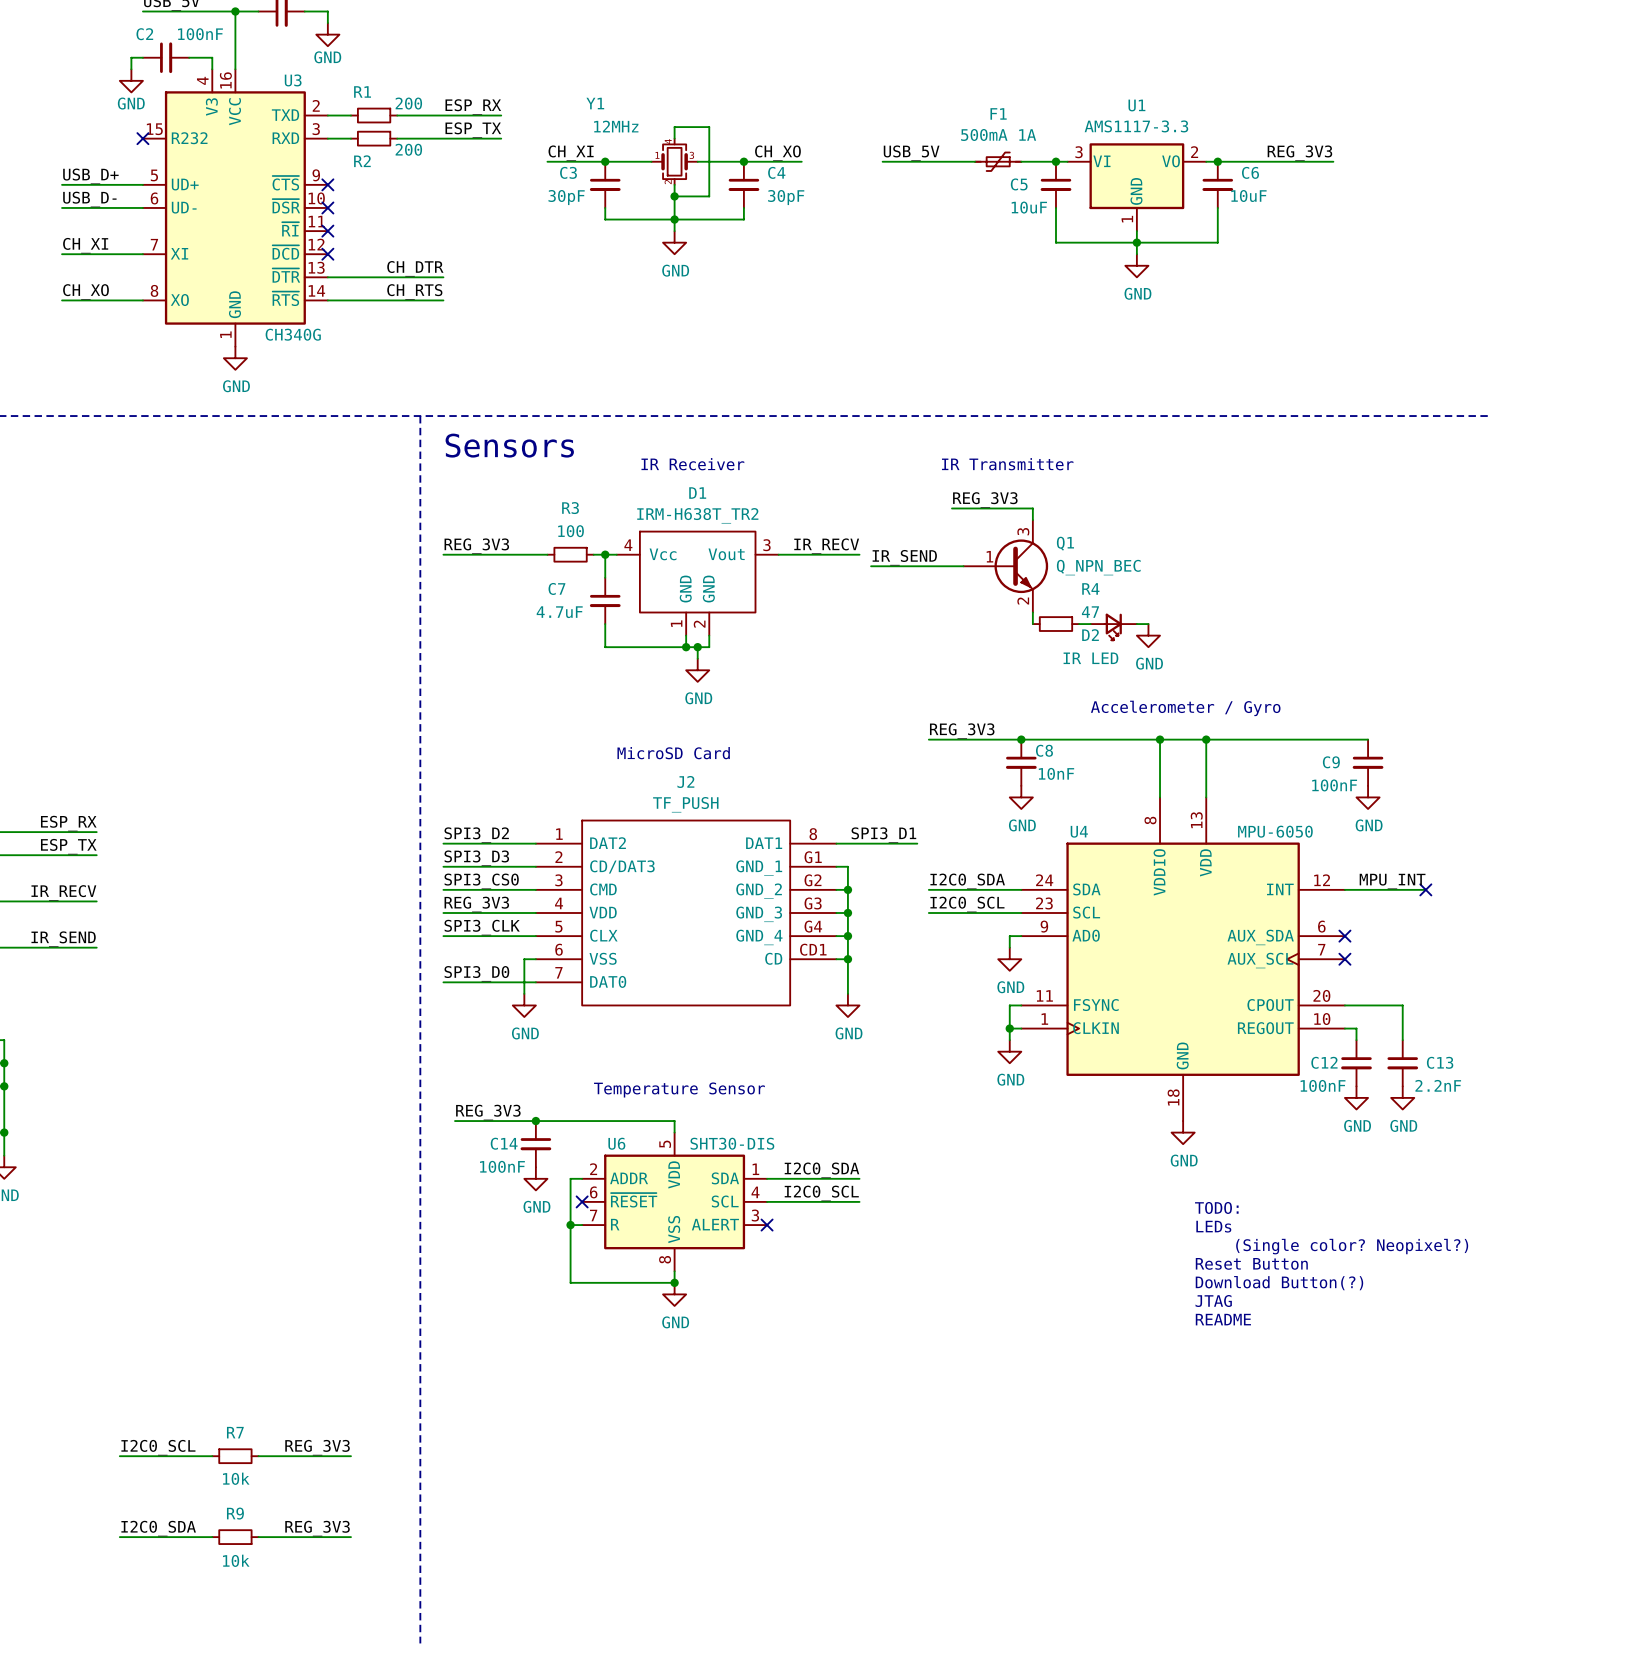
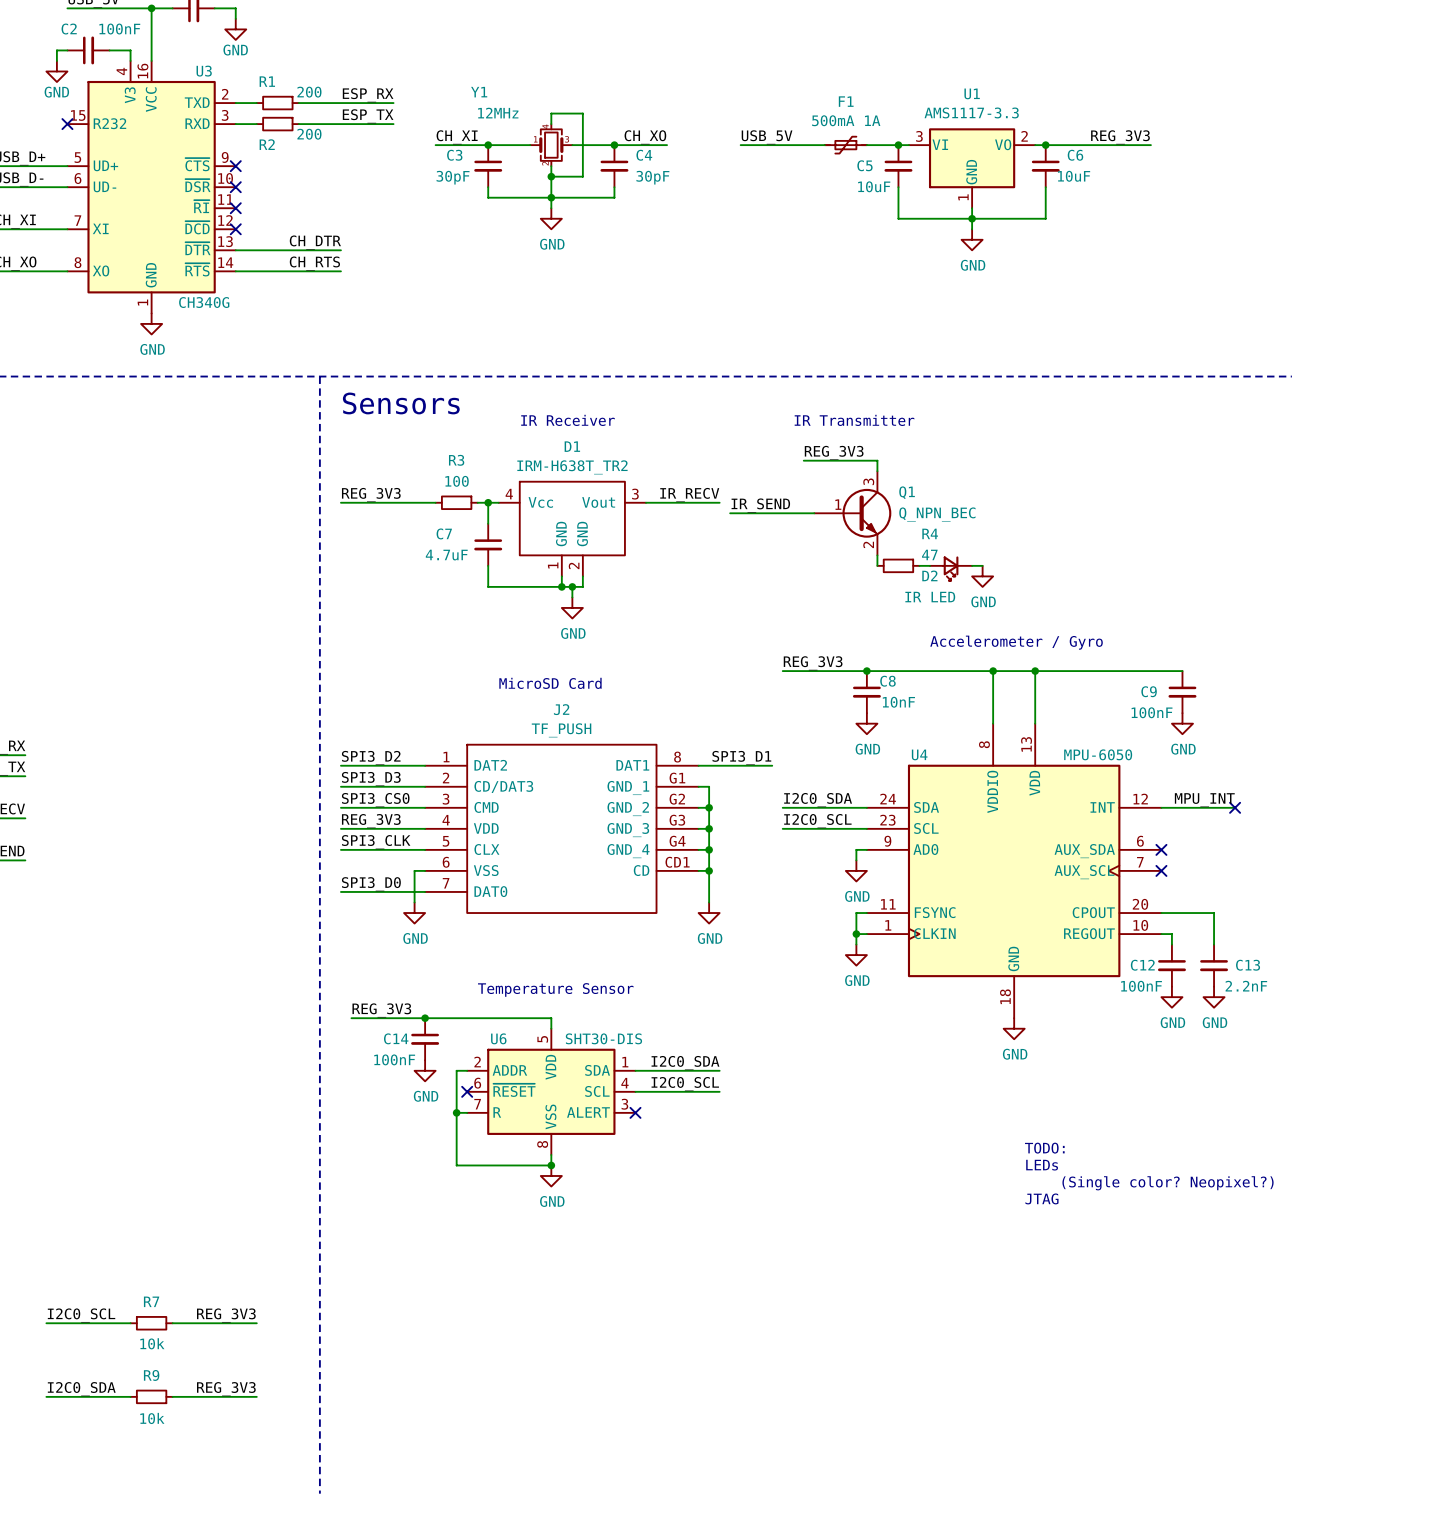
text: TODO: (1216, 1207) -> none
text: LEDs (1213, 1226) -> none
text: (Single color? Neopixel?) (1352, 1246) -> none
text: Reset Button (1251, 1263) -> TODO: (1044, 1148)
text: Download Button(?) (1279, 1283) -> LEDs (1042, 1165)
text: JTAG (1213, 1301) -> (Single color? Neopixel?) (1168, 1183)
text: README (1223, 1319) -> JTAG (1041, 1198)

